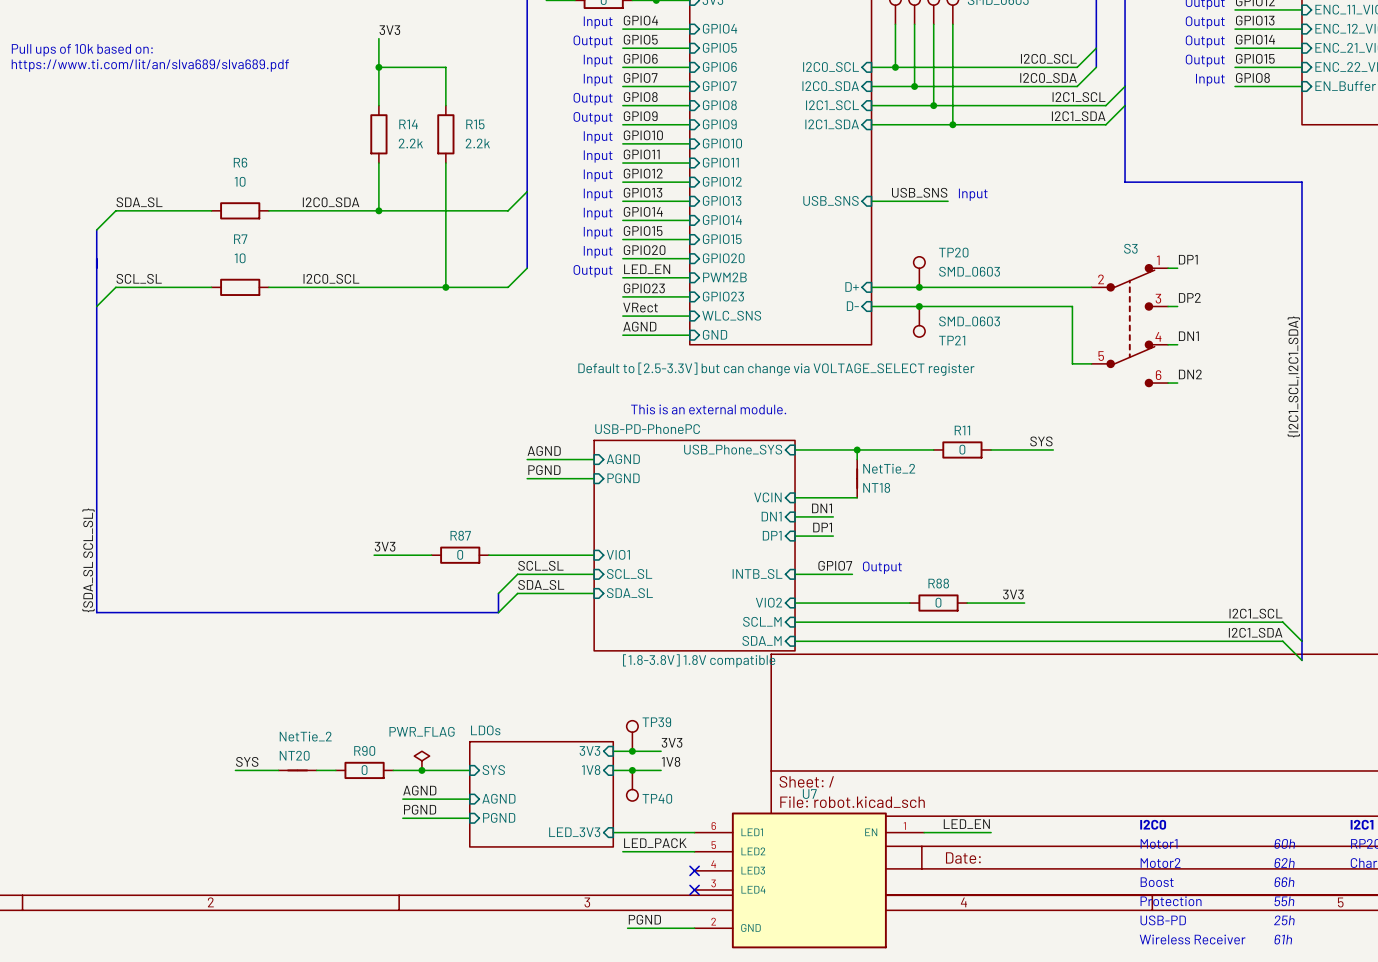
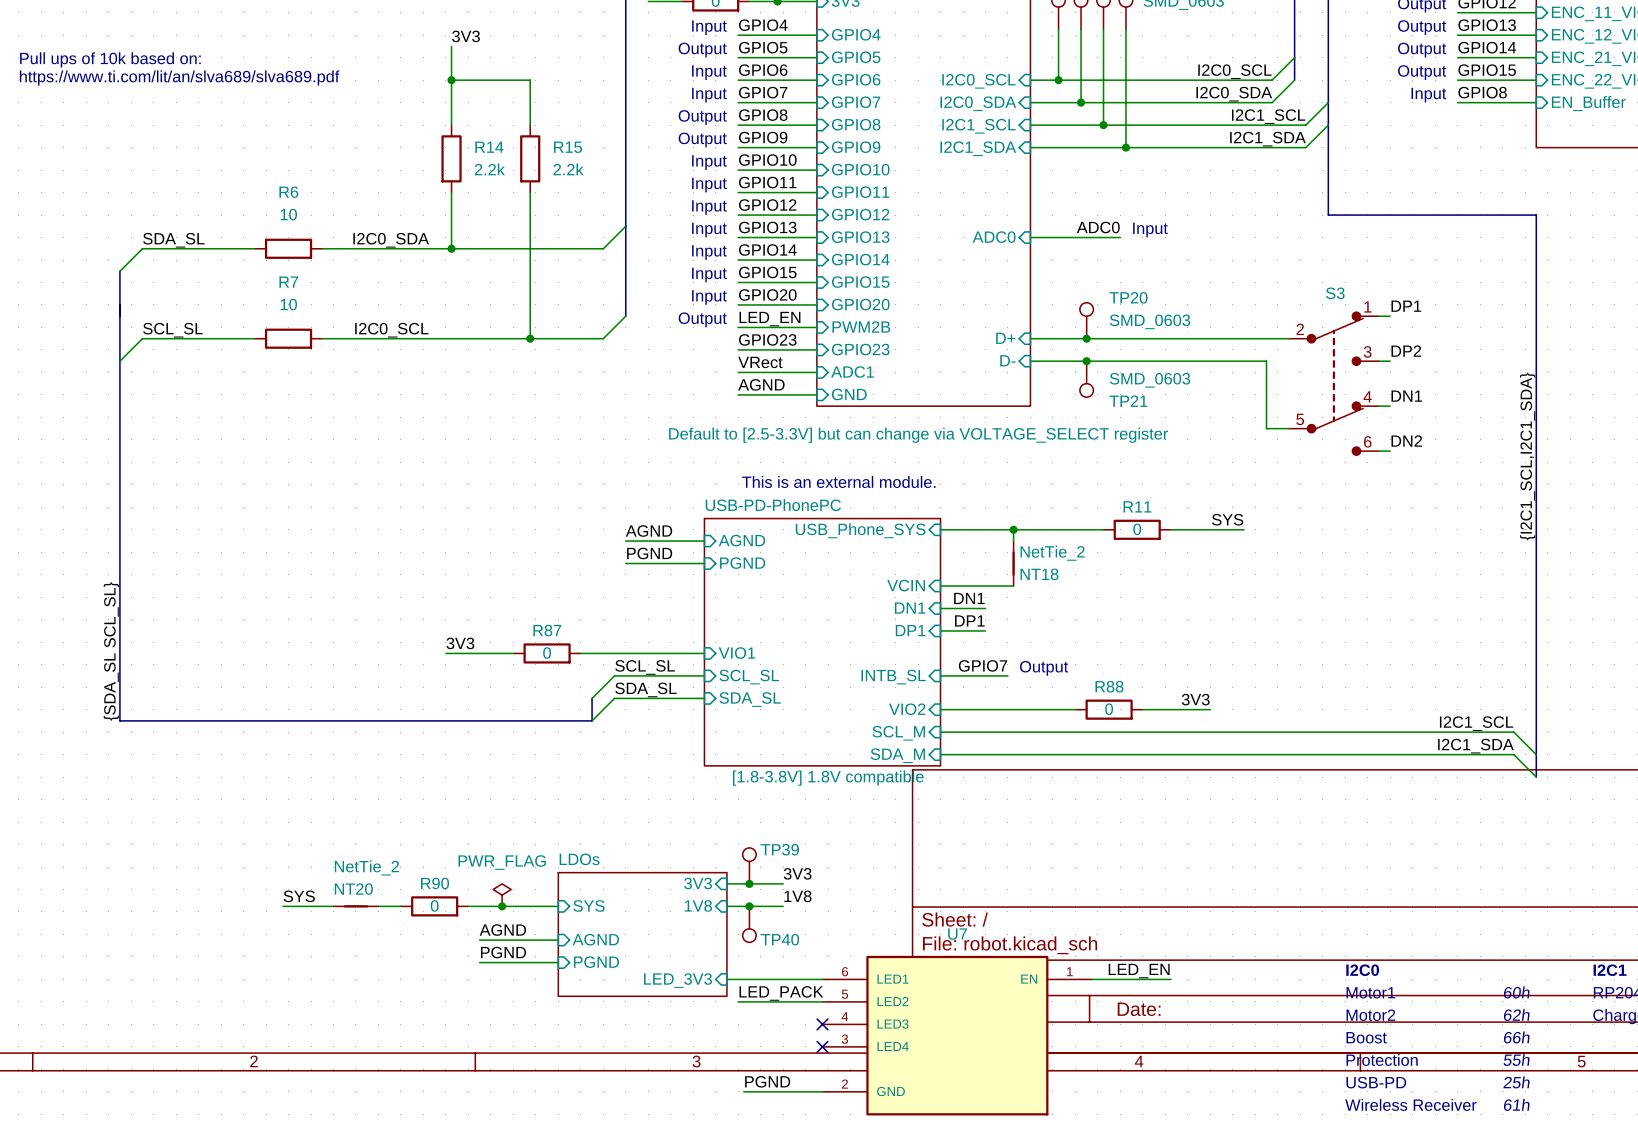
label: USB_SNS (919, 192) -> ADC0 (1098, 227)
sheet pin: USB_SNS (831, 200) -> ADC0 (994, 237)
sheet pin: WLC_SNS (731, 315) -> ADC1 (852, 372)

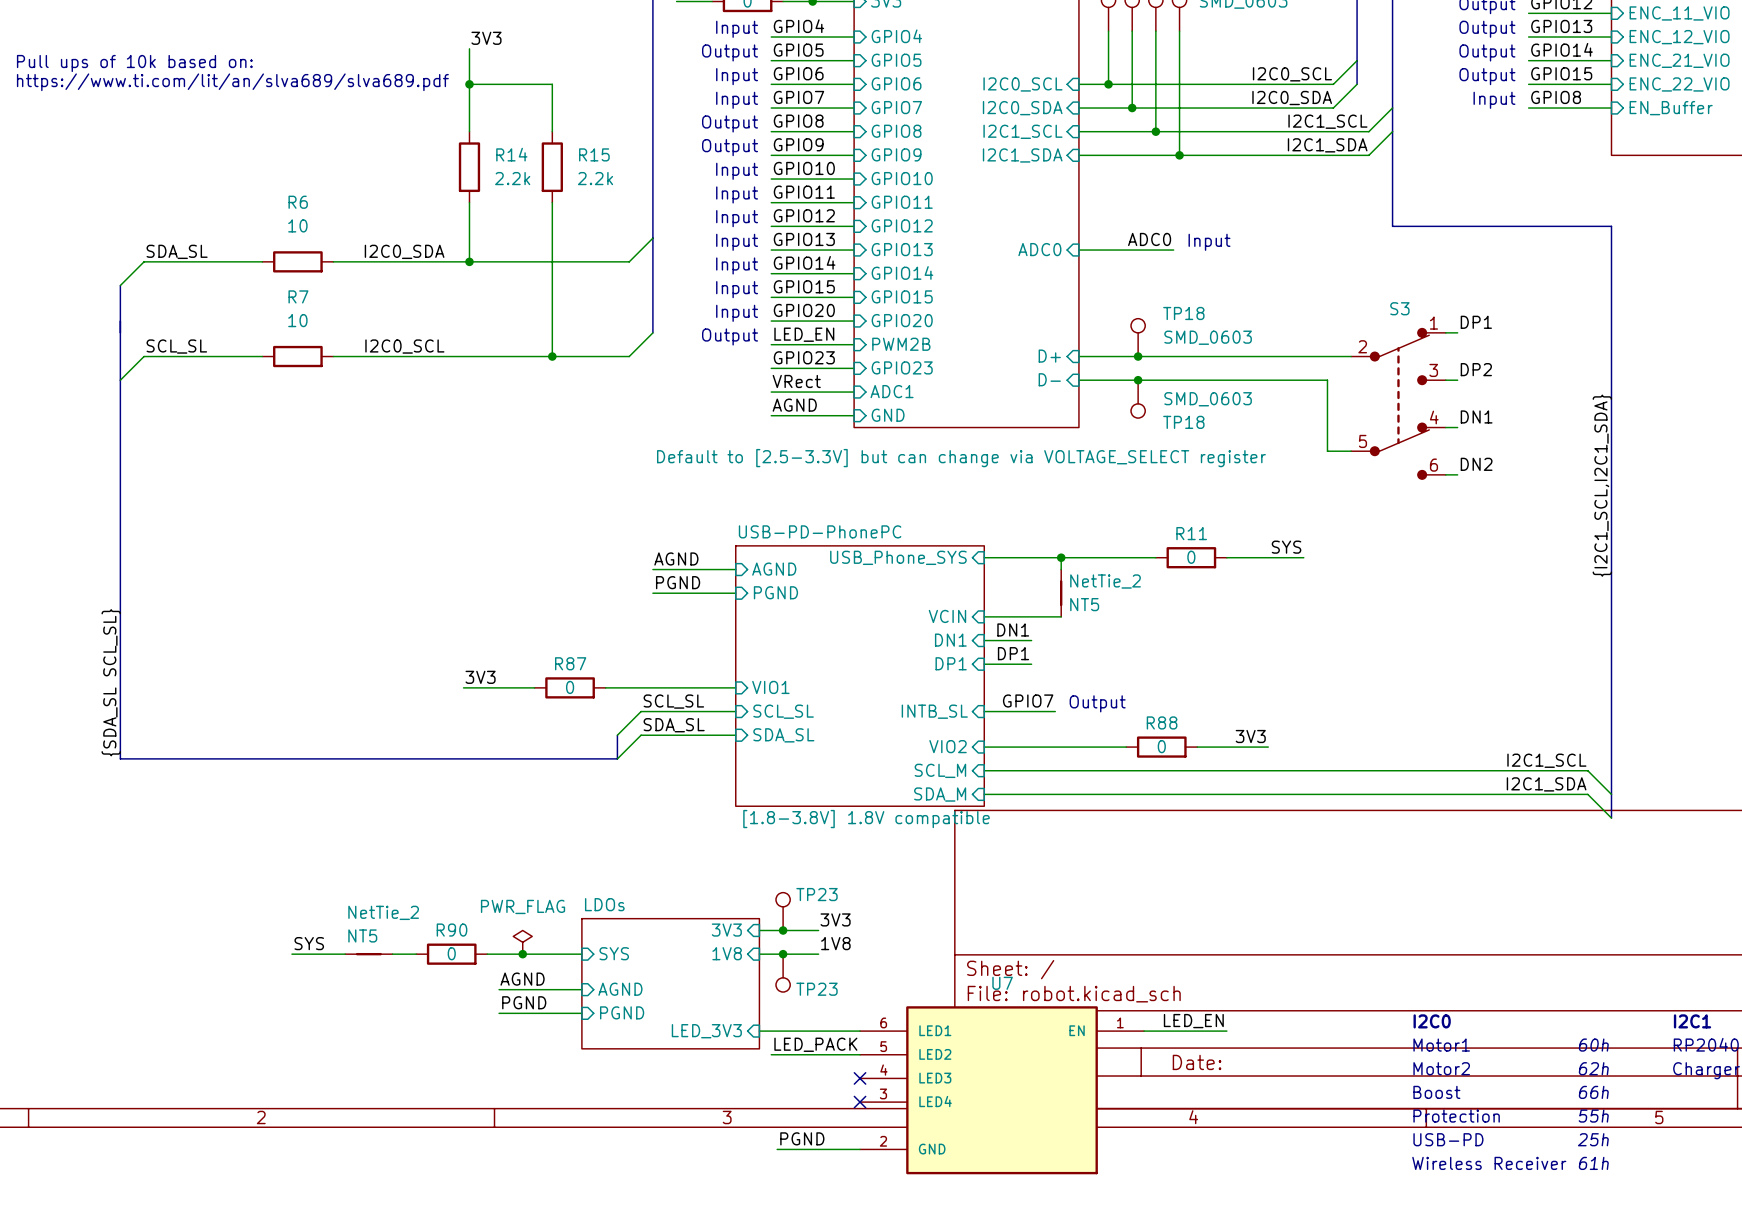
TP20 name: TP20 (1128, 297) -> TP18 (1183, 313)
TP21 name: TP21 (1128, 401) -> TP18 (1183, 422)
text: This is an external module. (838, 481) -> none
NT18 name: NT18 (1039, 574) -> NT5 (1084, 604)
TP39 name: TP39 (779, 849) -> TP23 (816, 894)
NT20 name: NT20 (353, 889) -> NT5 (362, 935)
TP40 name: TP40 (780, 939) -> TP23 (816, 989)

